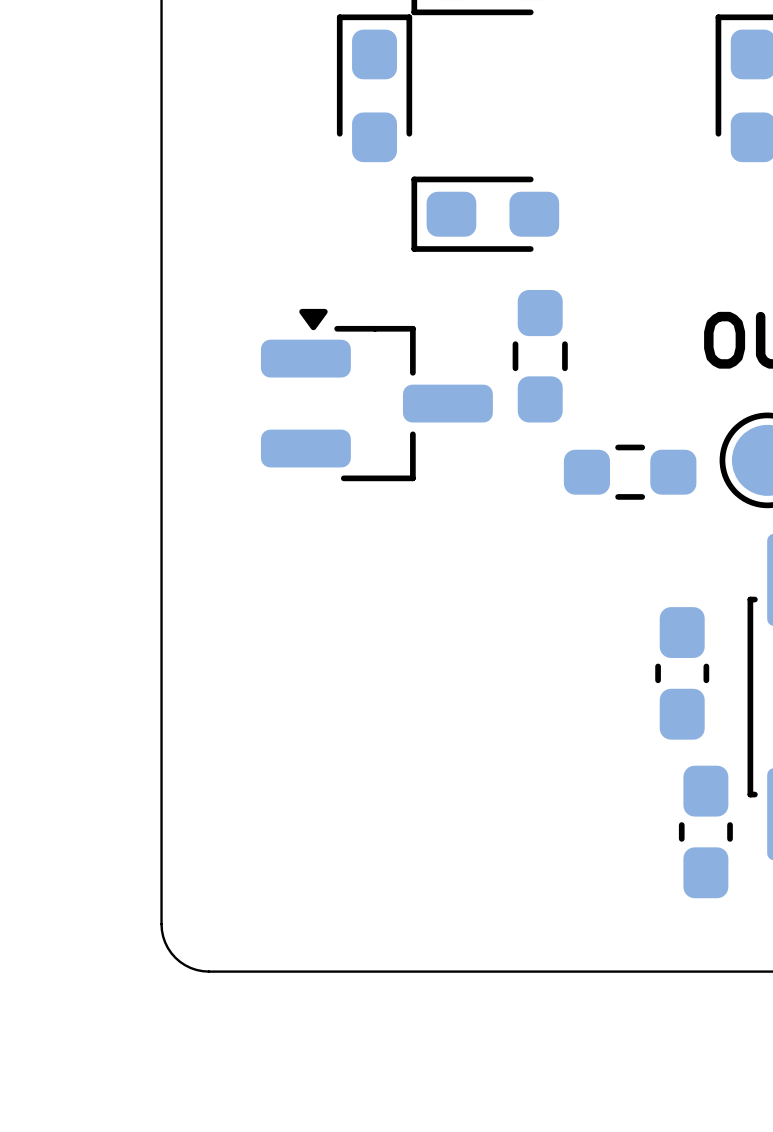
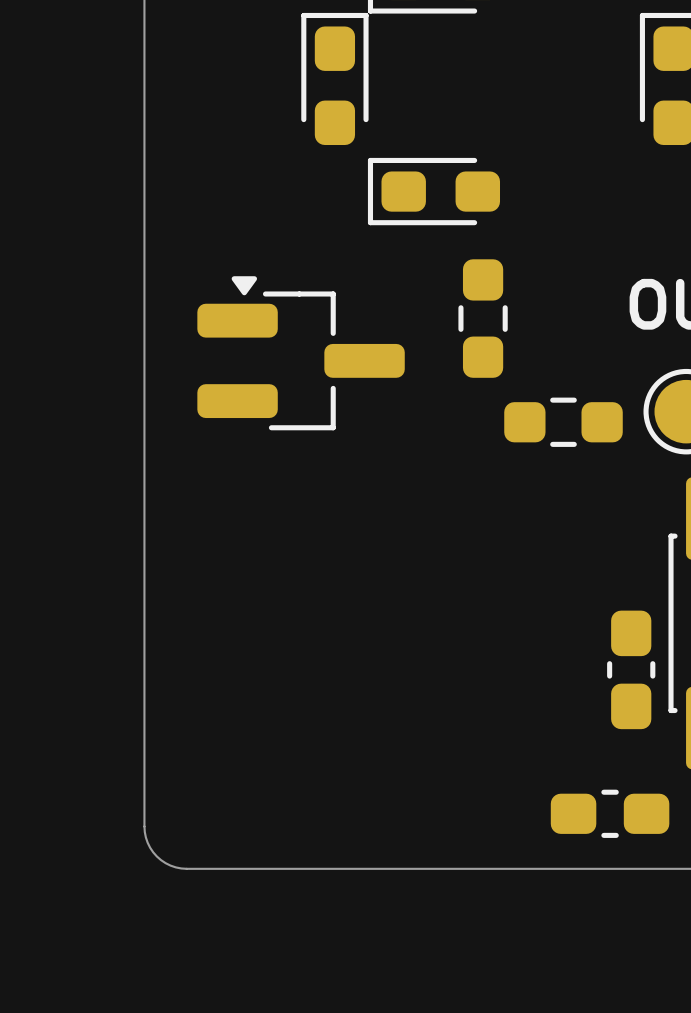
part position: (376, 395) -> (301, 353)
part: (682, 673) -> none
part: none -> (631, 669)
part: (705, 831) -> none
part: none -> (610, 813)

